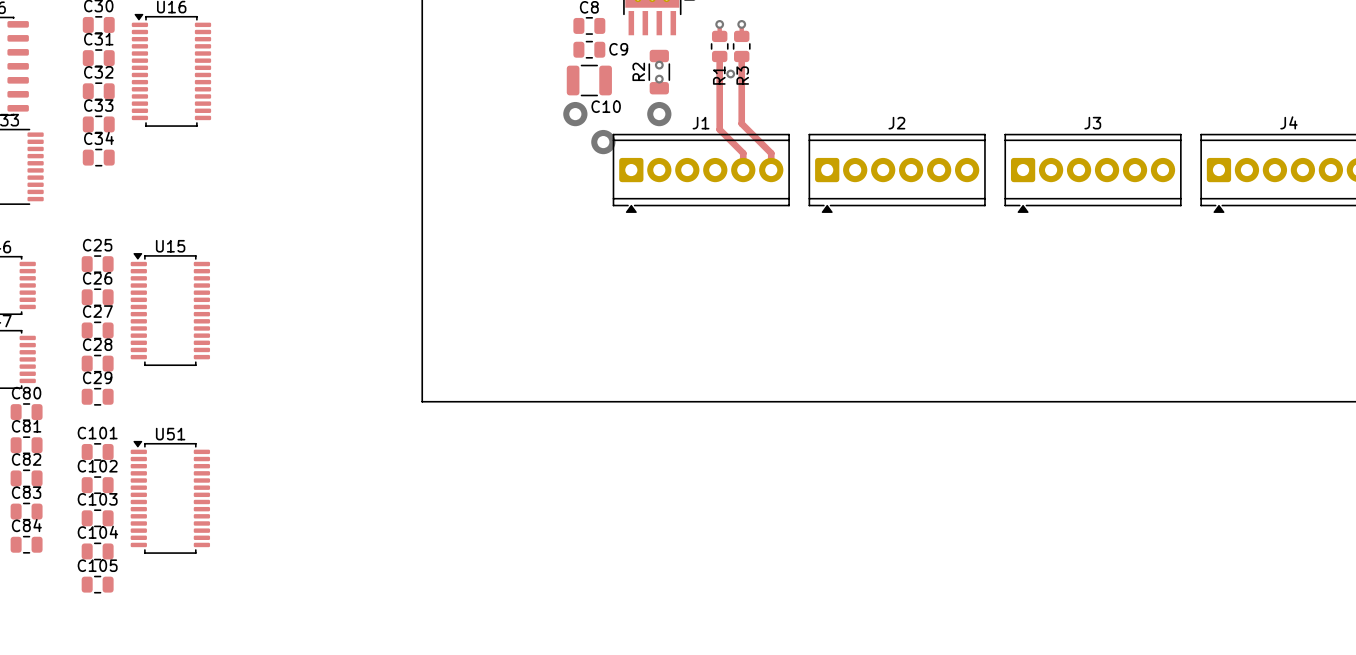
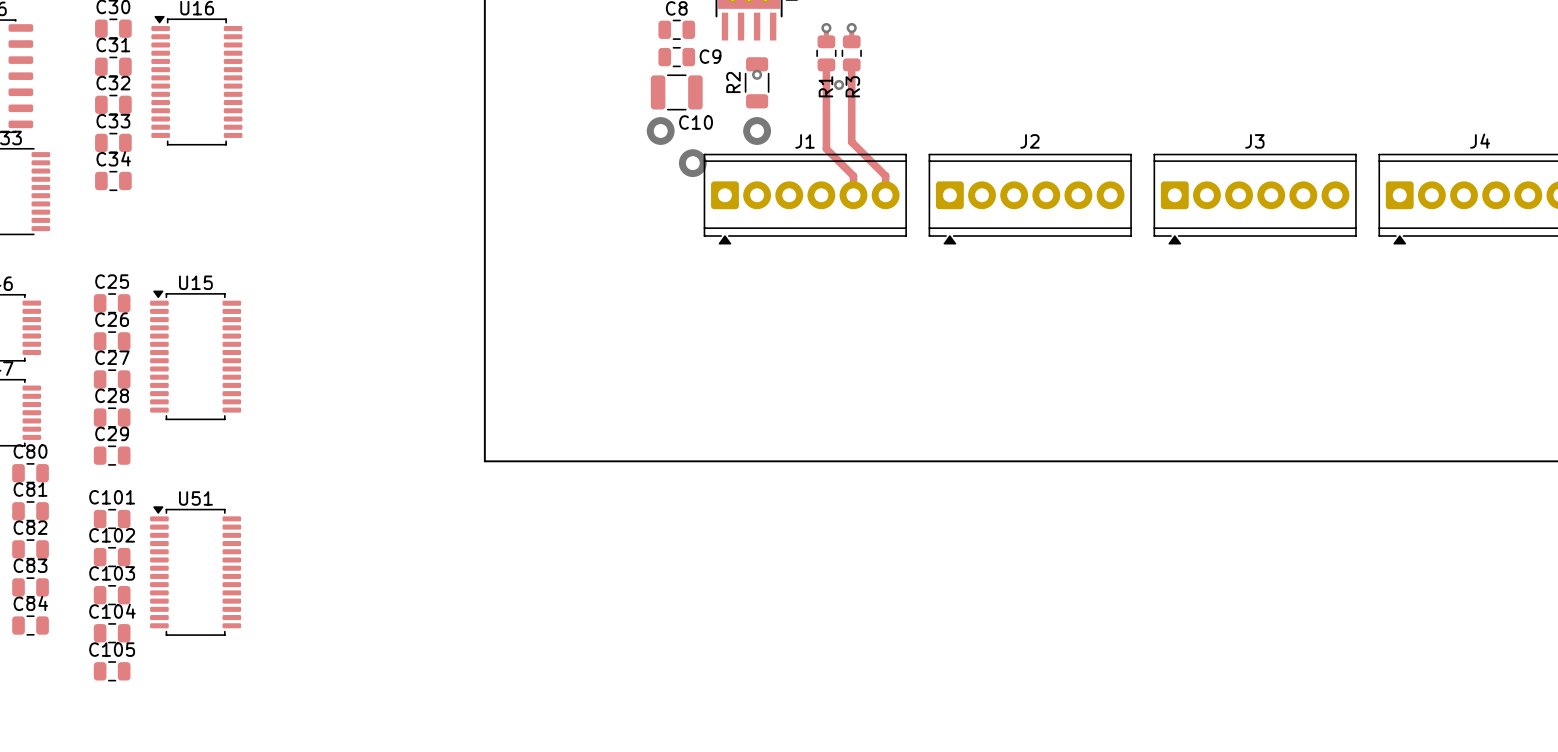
via: (659, 79) -> none

